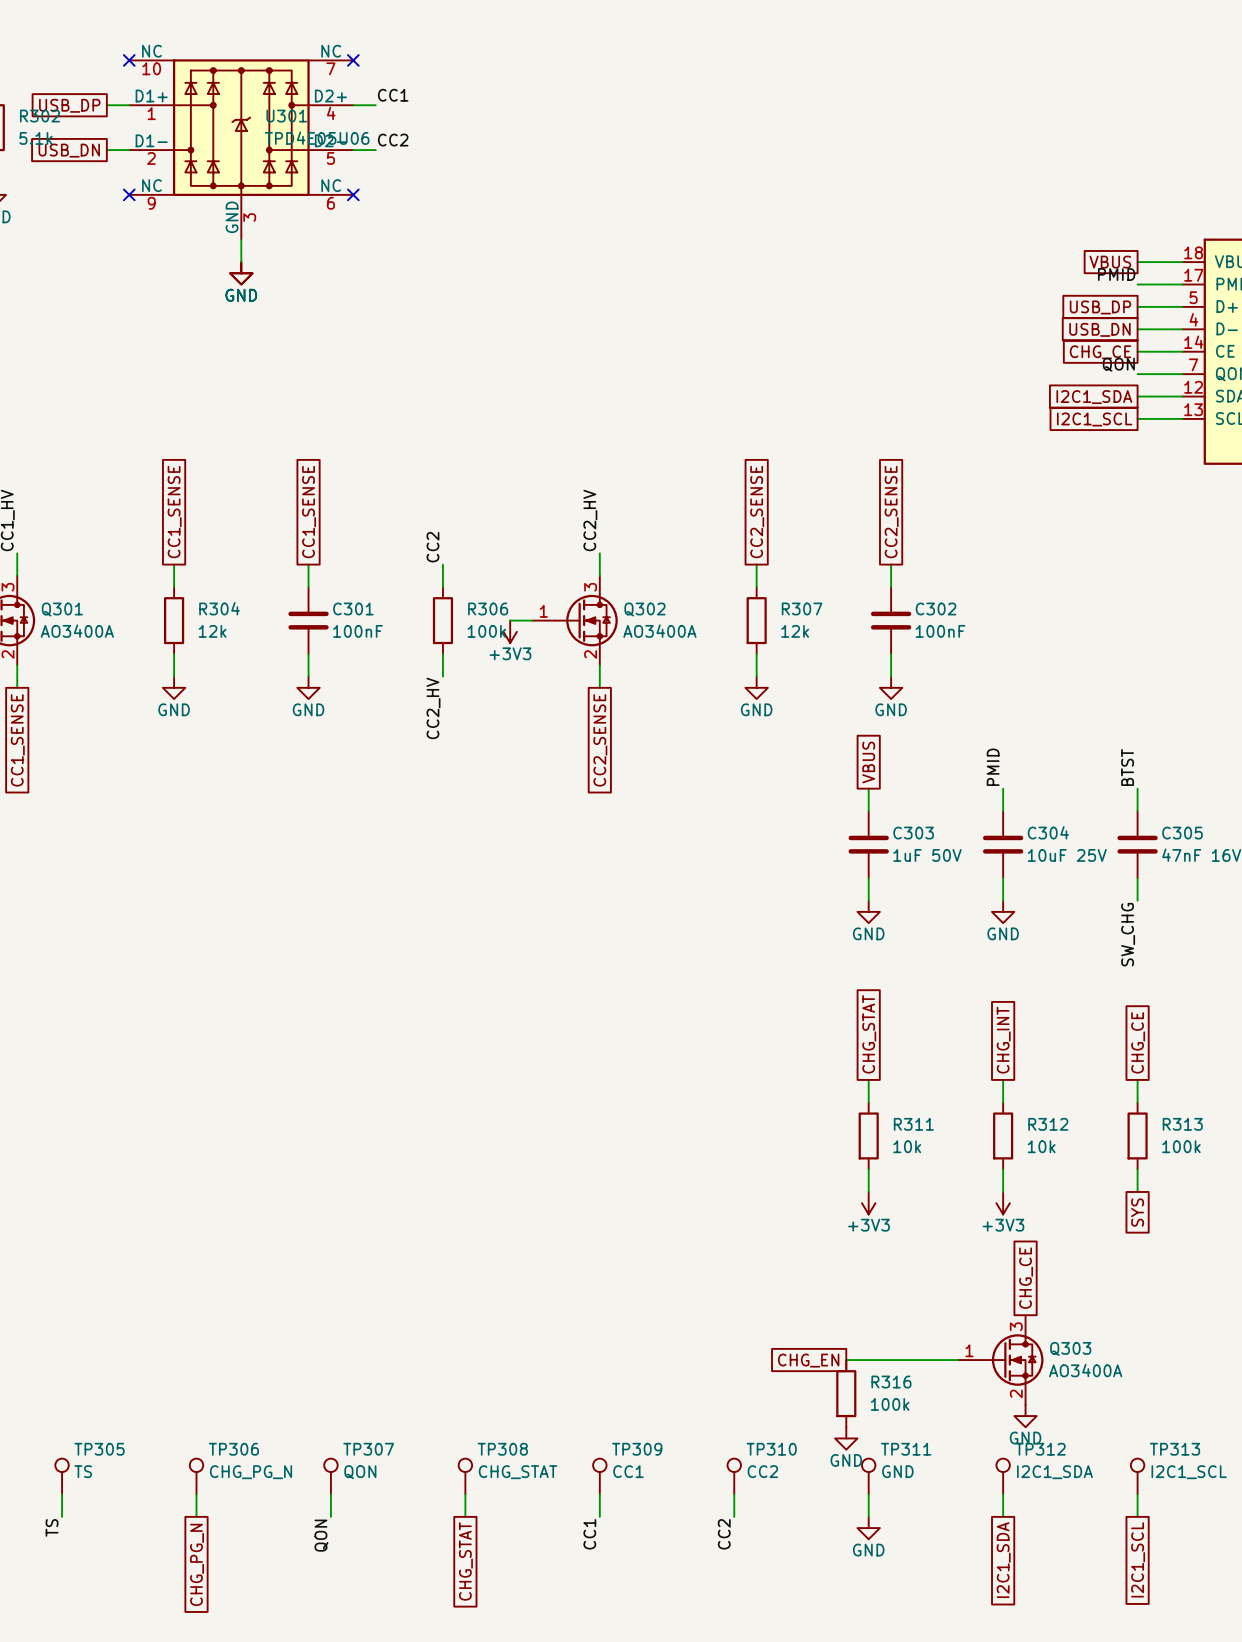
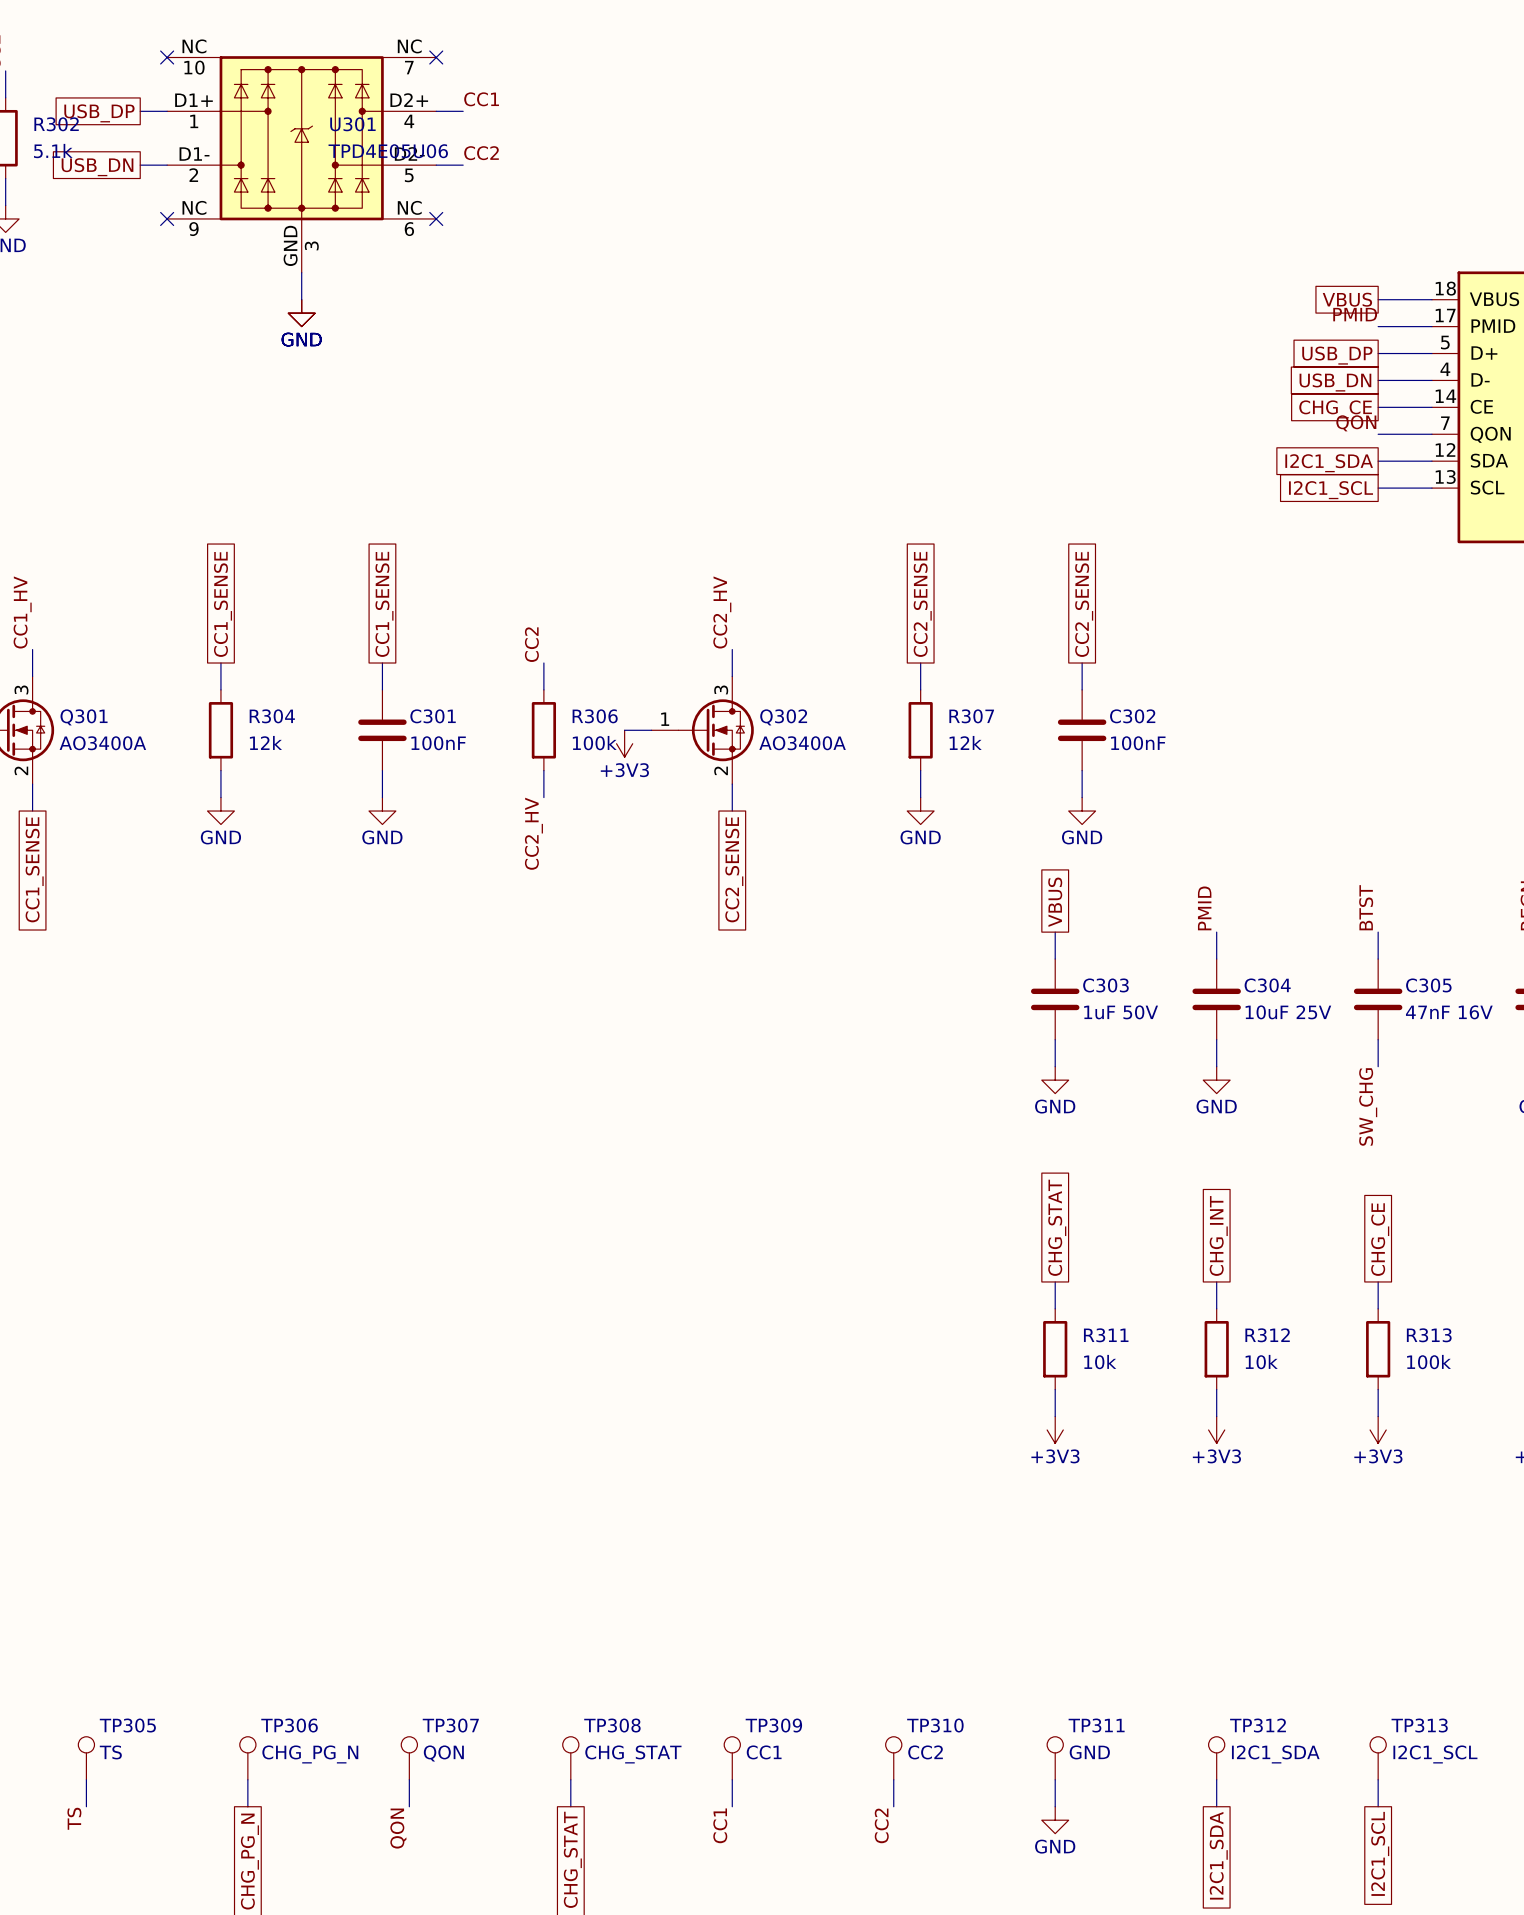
power symbol: none -> +3V3 (1378, 1429)
global label: SYS (1137, 1212) -> none
global label: CHG_CE (1026, 1278) -> none
global label: CHG_EN (808, 1360) -> none
wire: (846, 1360) (958, 1360) -> none
Q303: AO3400A (1000, 1360) -> none
R316: 100k (846, 1393) -> none
power symbol: GND (1025, 1416) -> none
power symbol: GND (846, 1438) -> none

